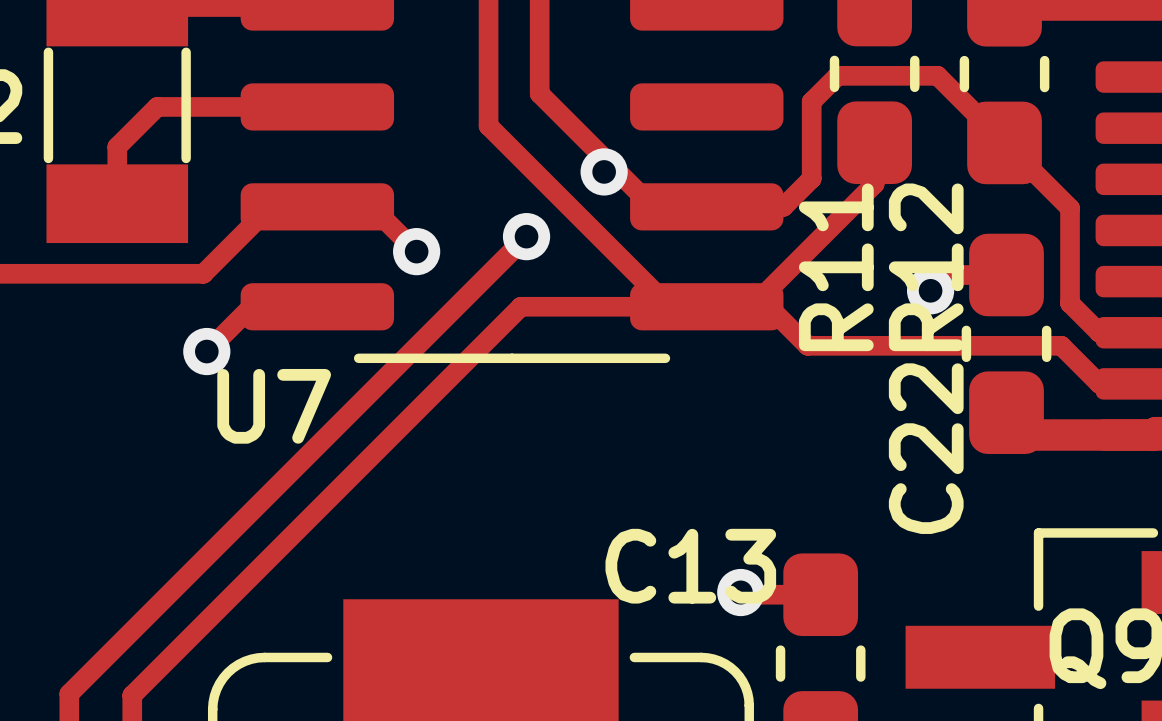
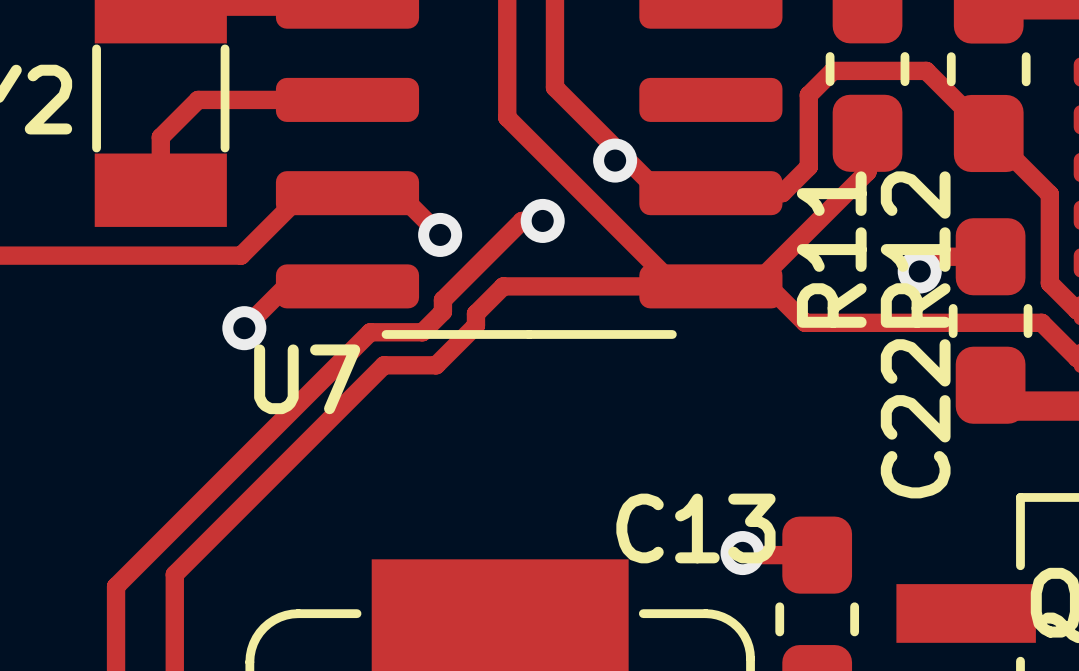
track: (526, 236) (69, 693) -> (542, 220) (522, 220) (442, 300) (442, 311) (422, 332) (370, 332) (116, 586) (116, 647)
track: (520, 306) (132, 695) -> (537, 286) (503, 286) (475, 313) (475, 325) (436, 365) (383, 365) (174, 574) (174, 649)

